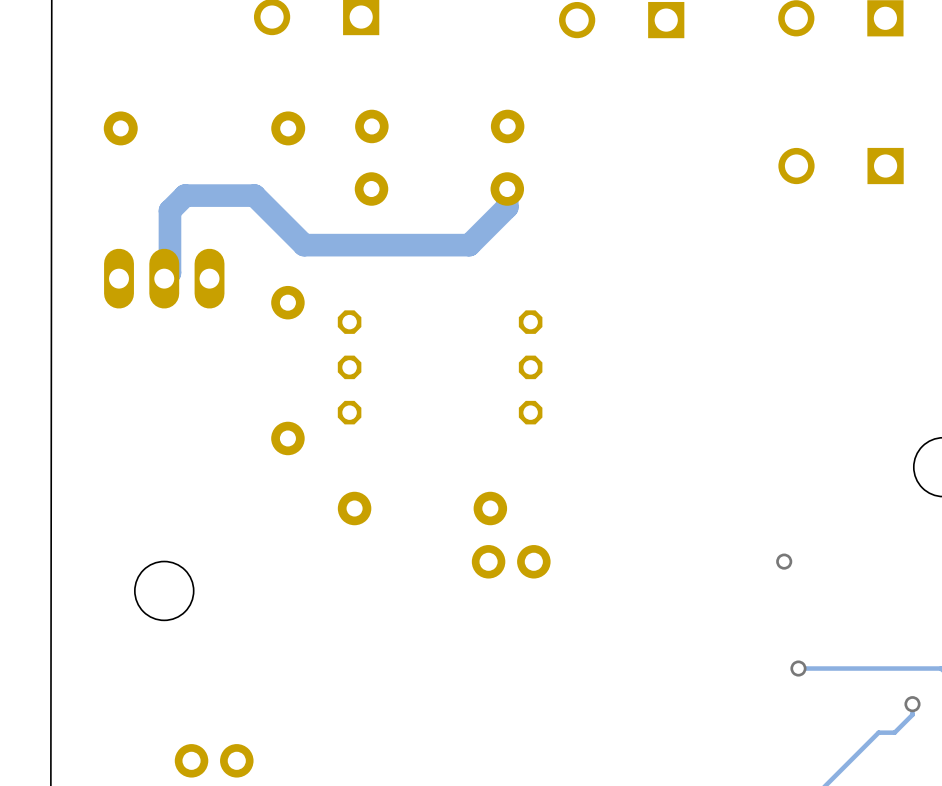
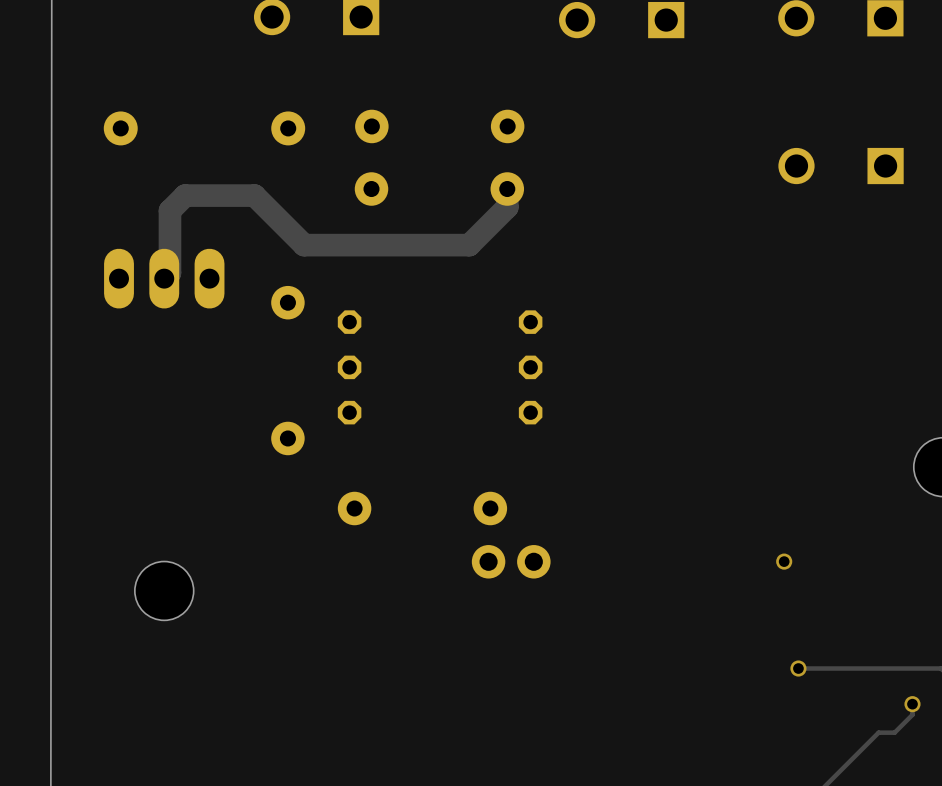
part: (214, 760) -> none

